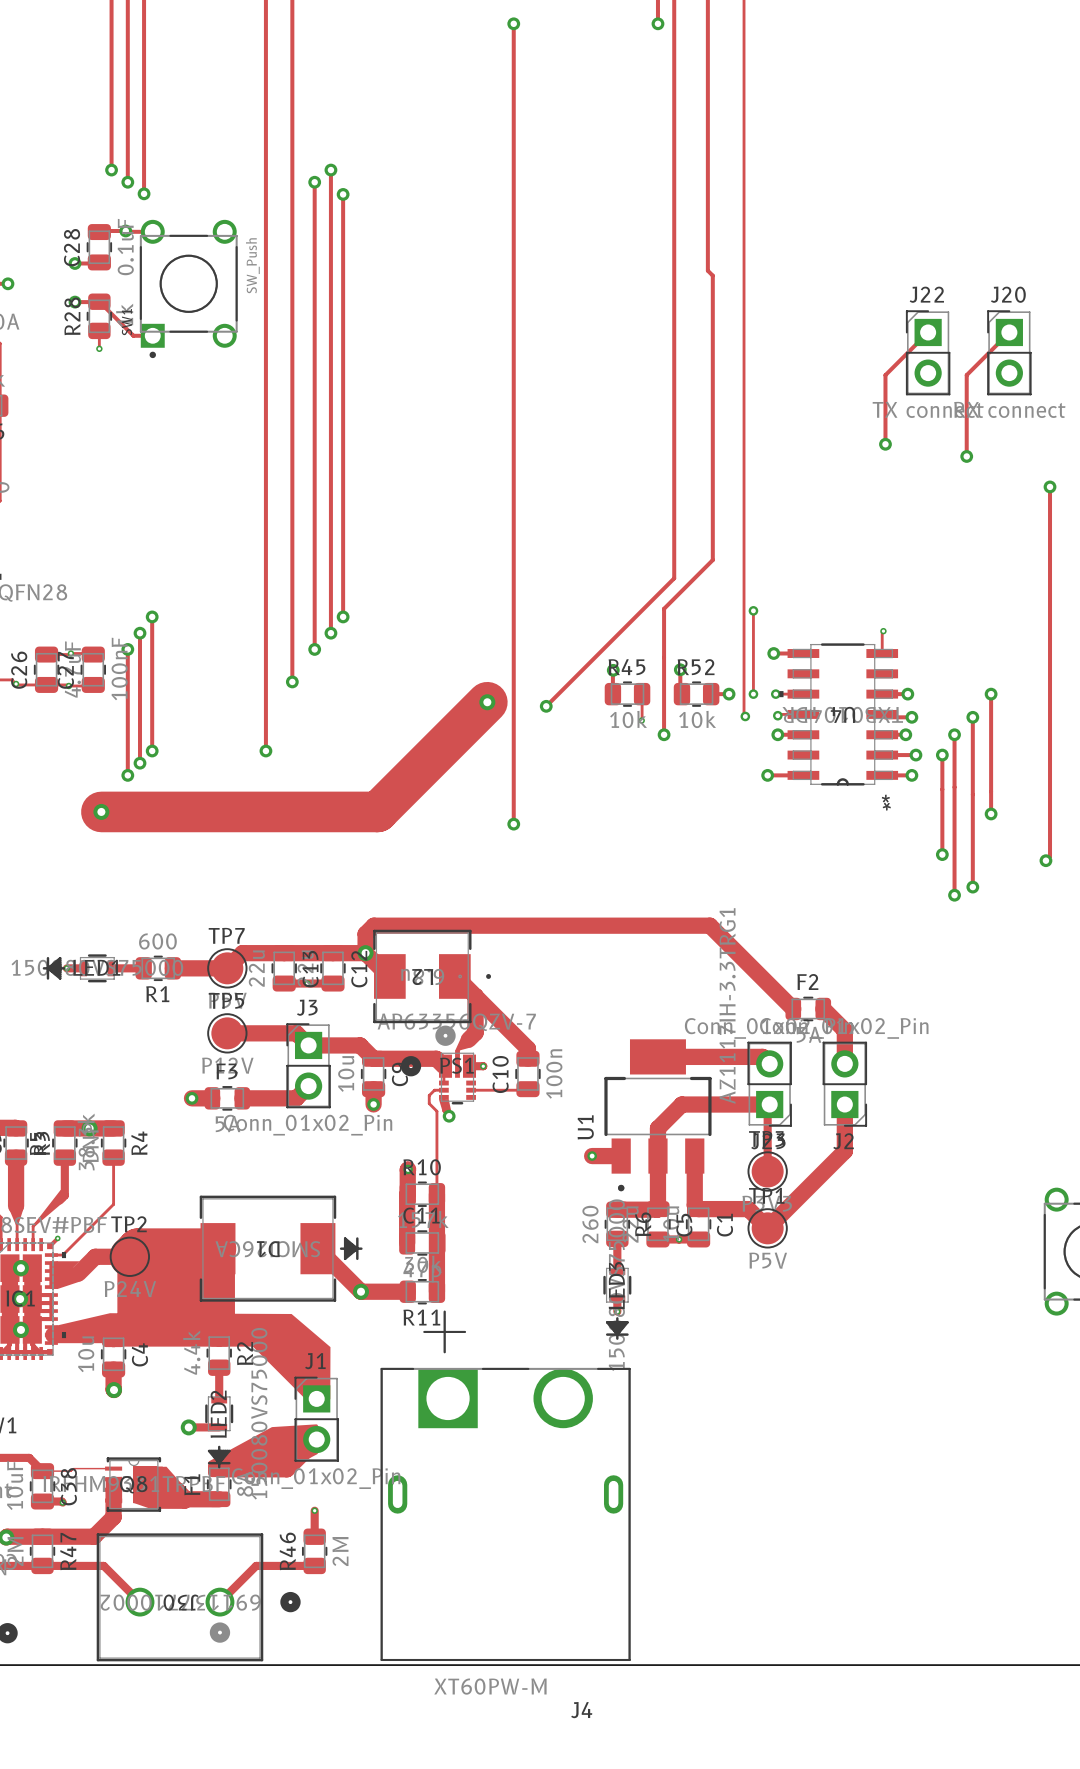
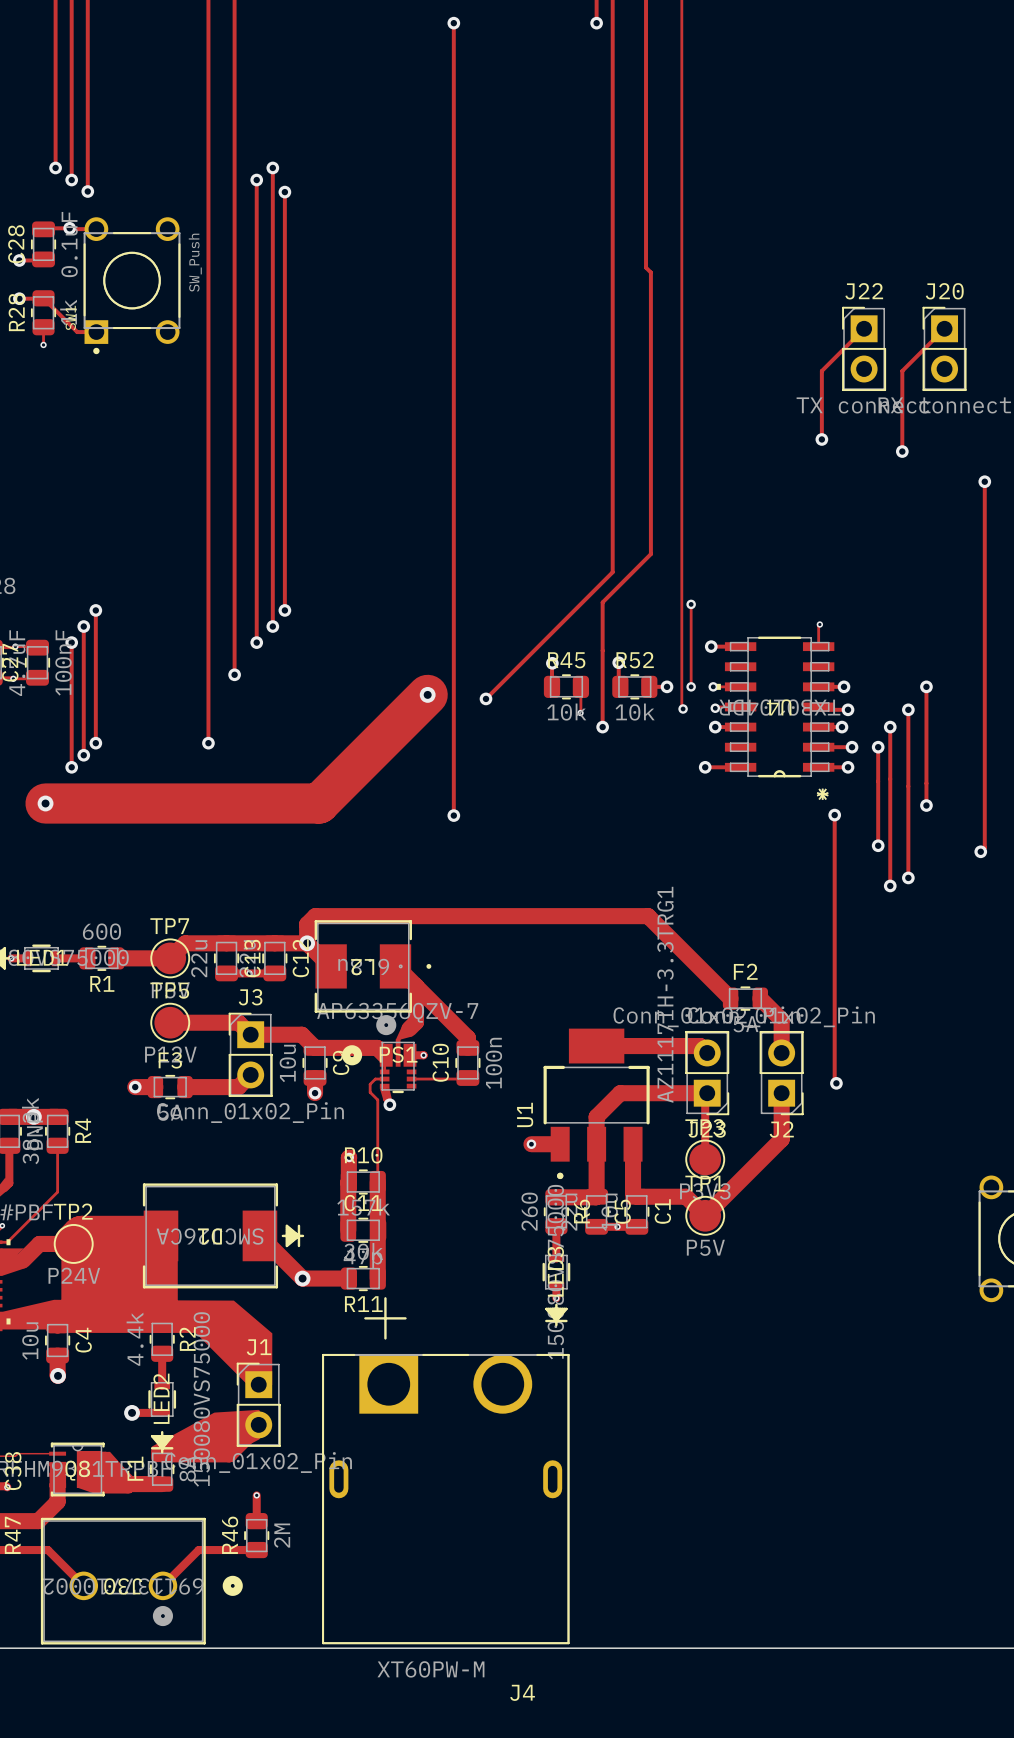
track: none -> (834, 815) (834, 1081) (836, 1083)
via: none -> (834, 815)
via: none -> (836, 1083)

